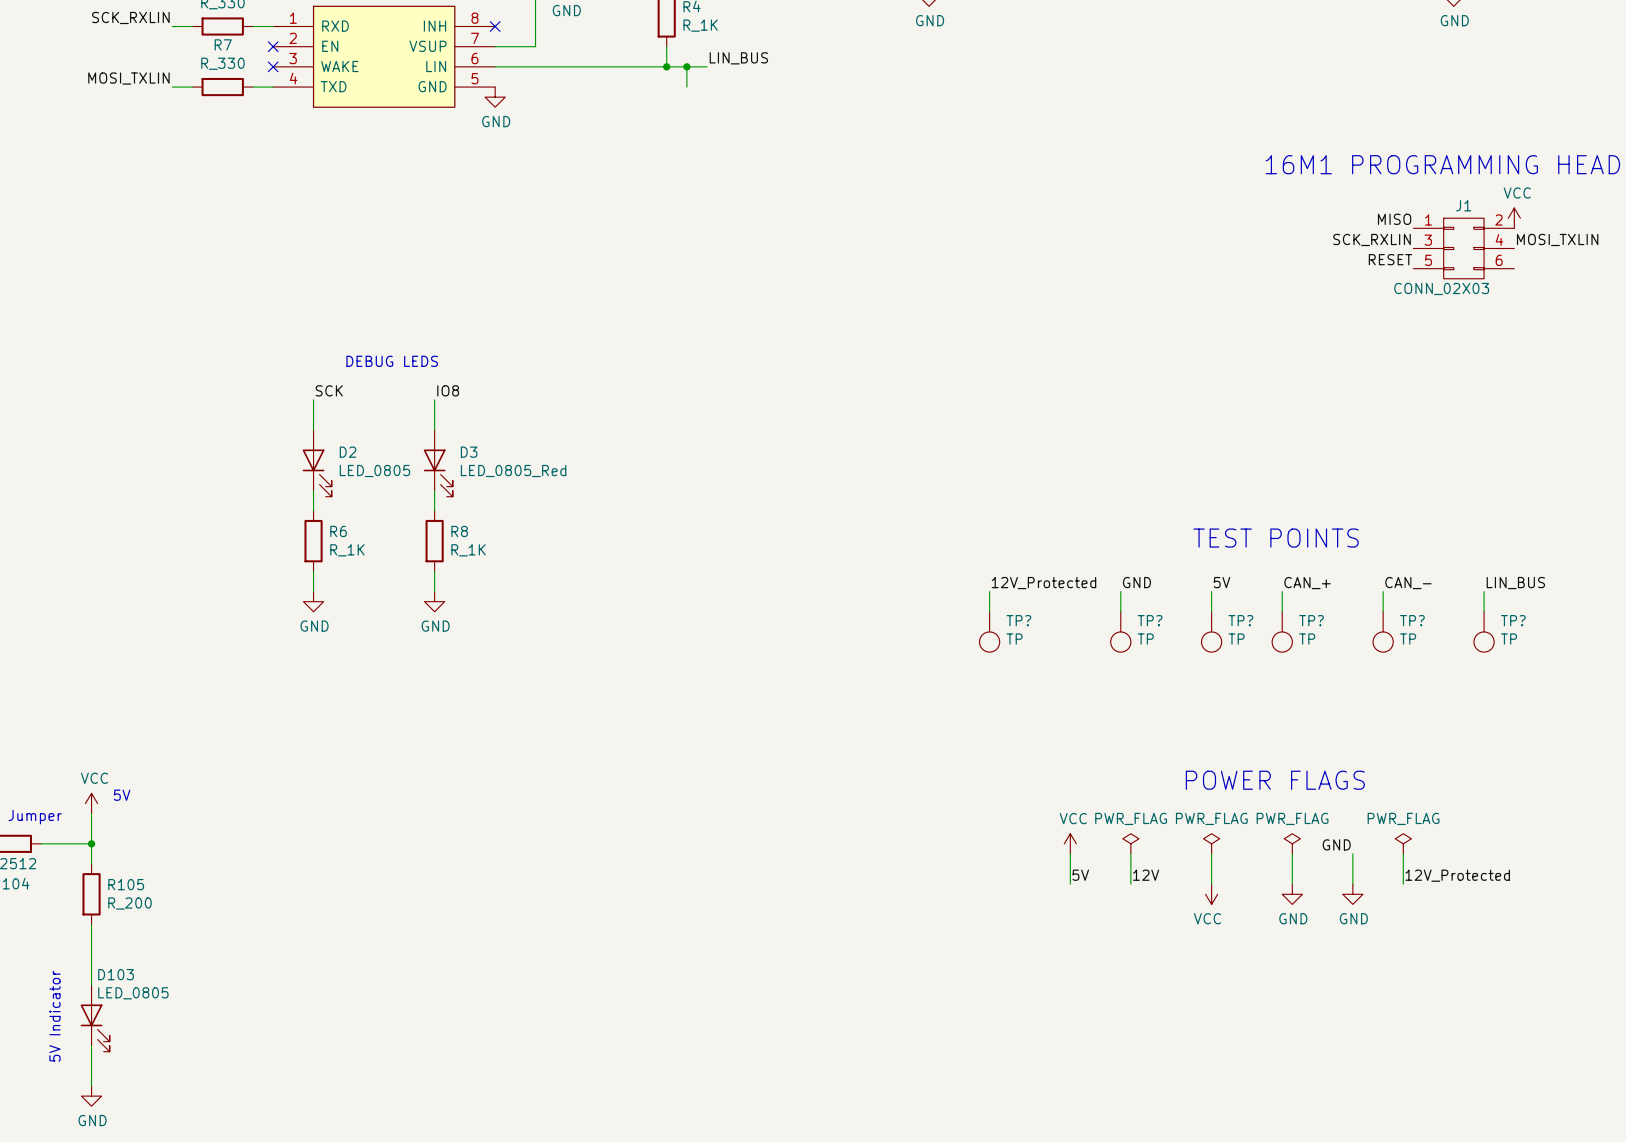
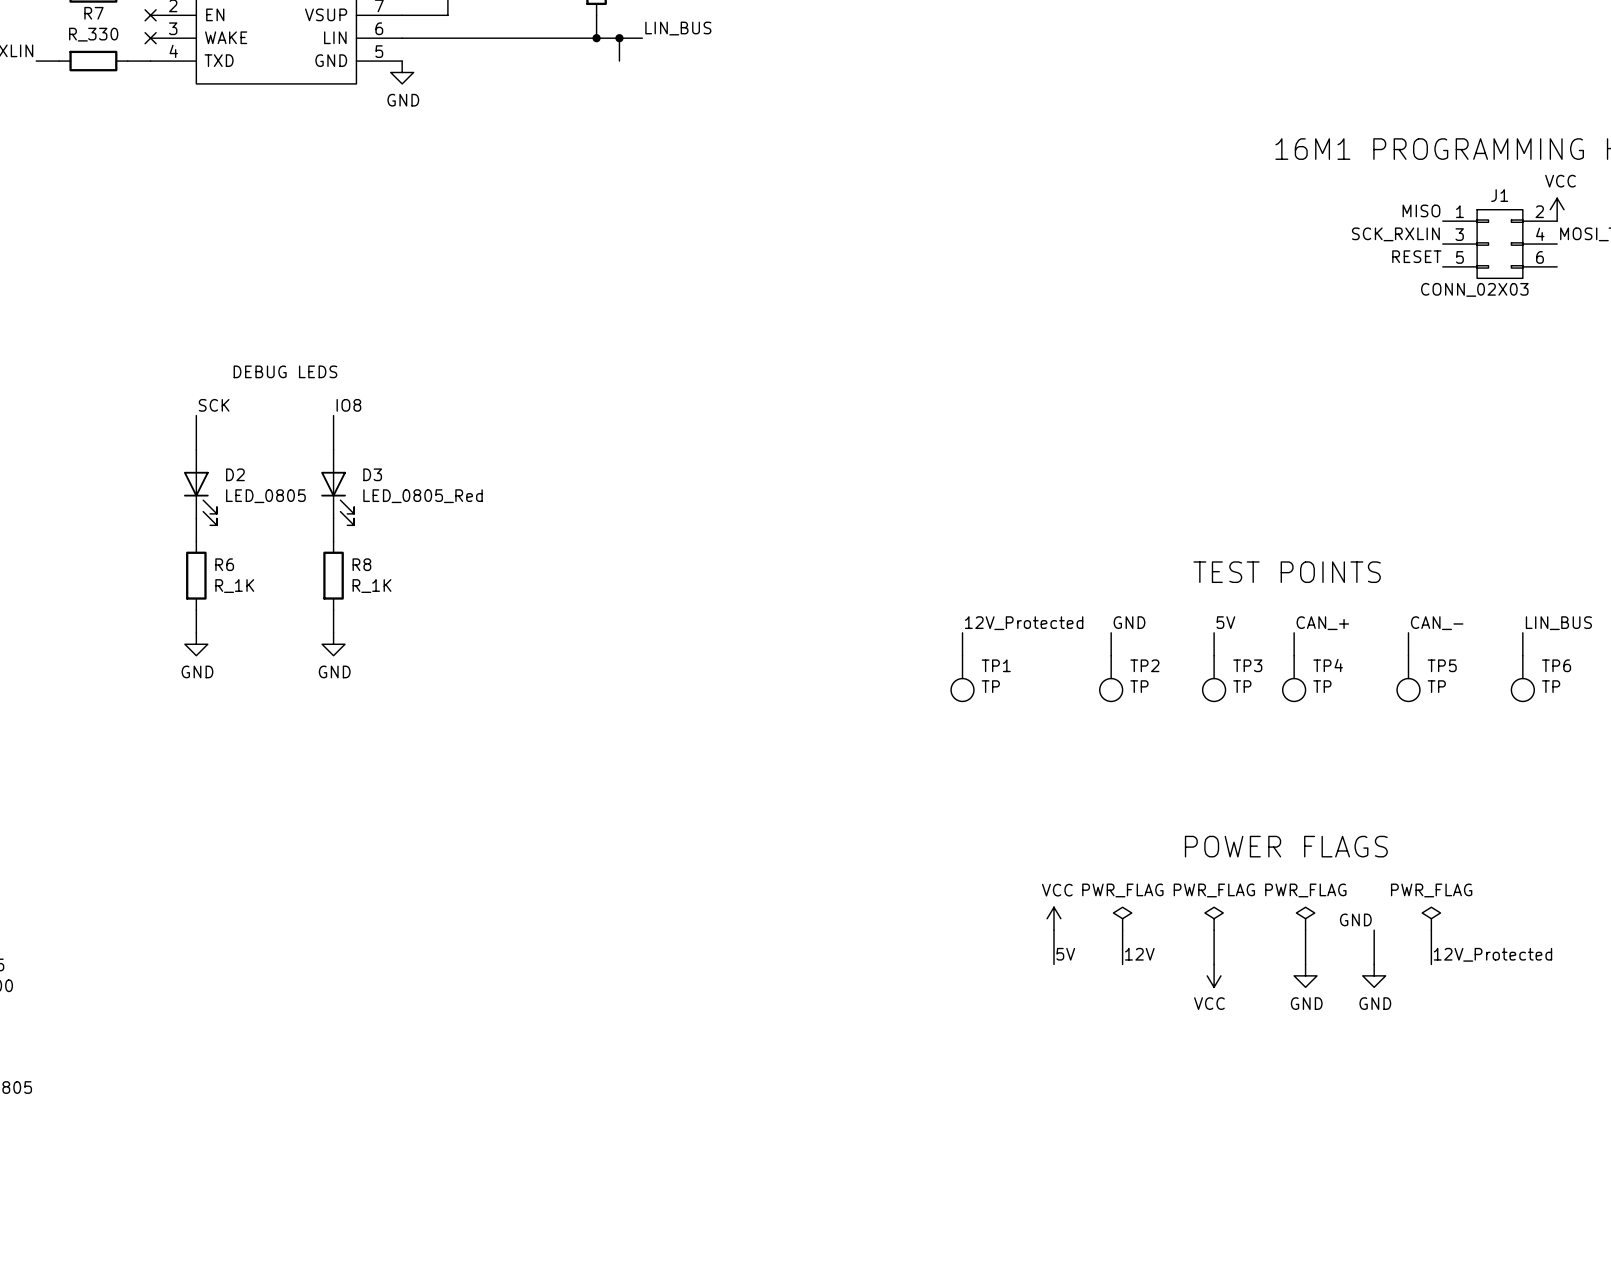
TP? name: TP? (1018, 620) -> TP1 (996, 665)
TP? name: TP? (1150, 620) -> TP2 (1144, 665)
TP? name: TP? (1240, 620) -> TP3 (1247, 665)
TP? name: TP? (1311, 620) -> TP4 (1328, 665)
TP? name: TP? (1412, 620) -> TP5 (1442, 665)
TP? name: TP? (1513, 620) -> TP6 (1556, 665)

